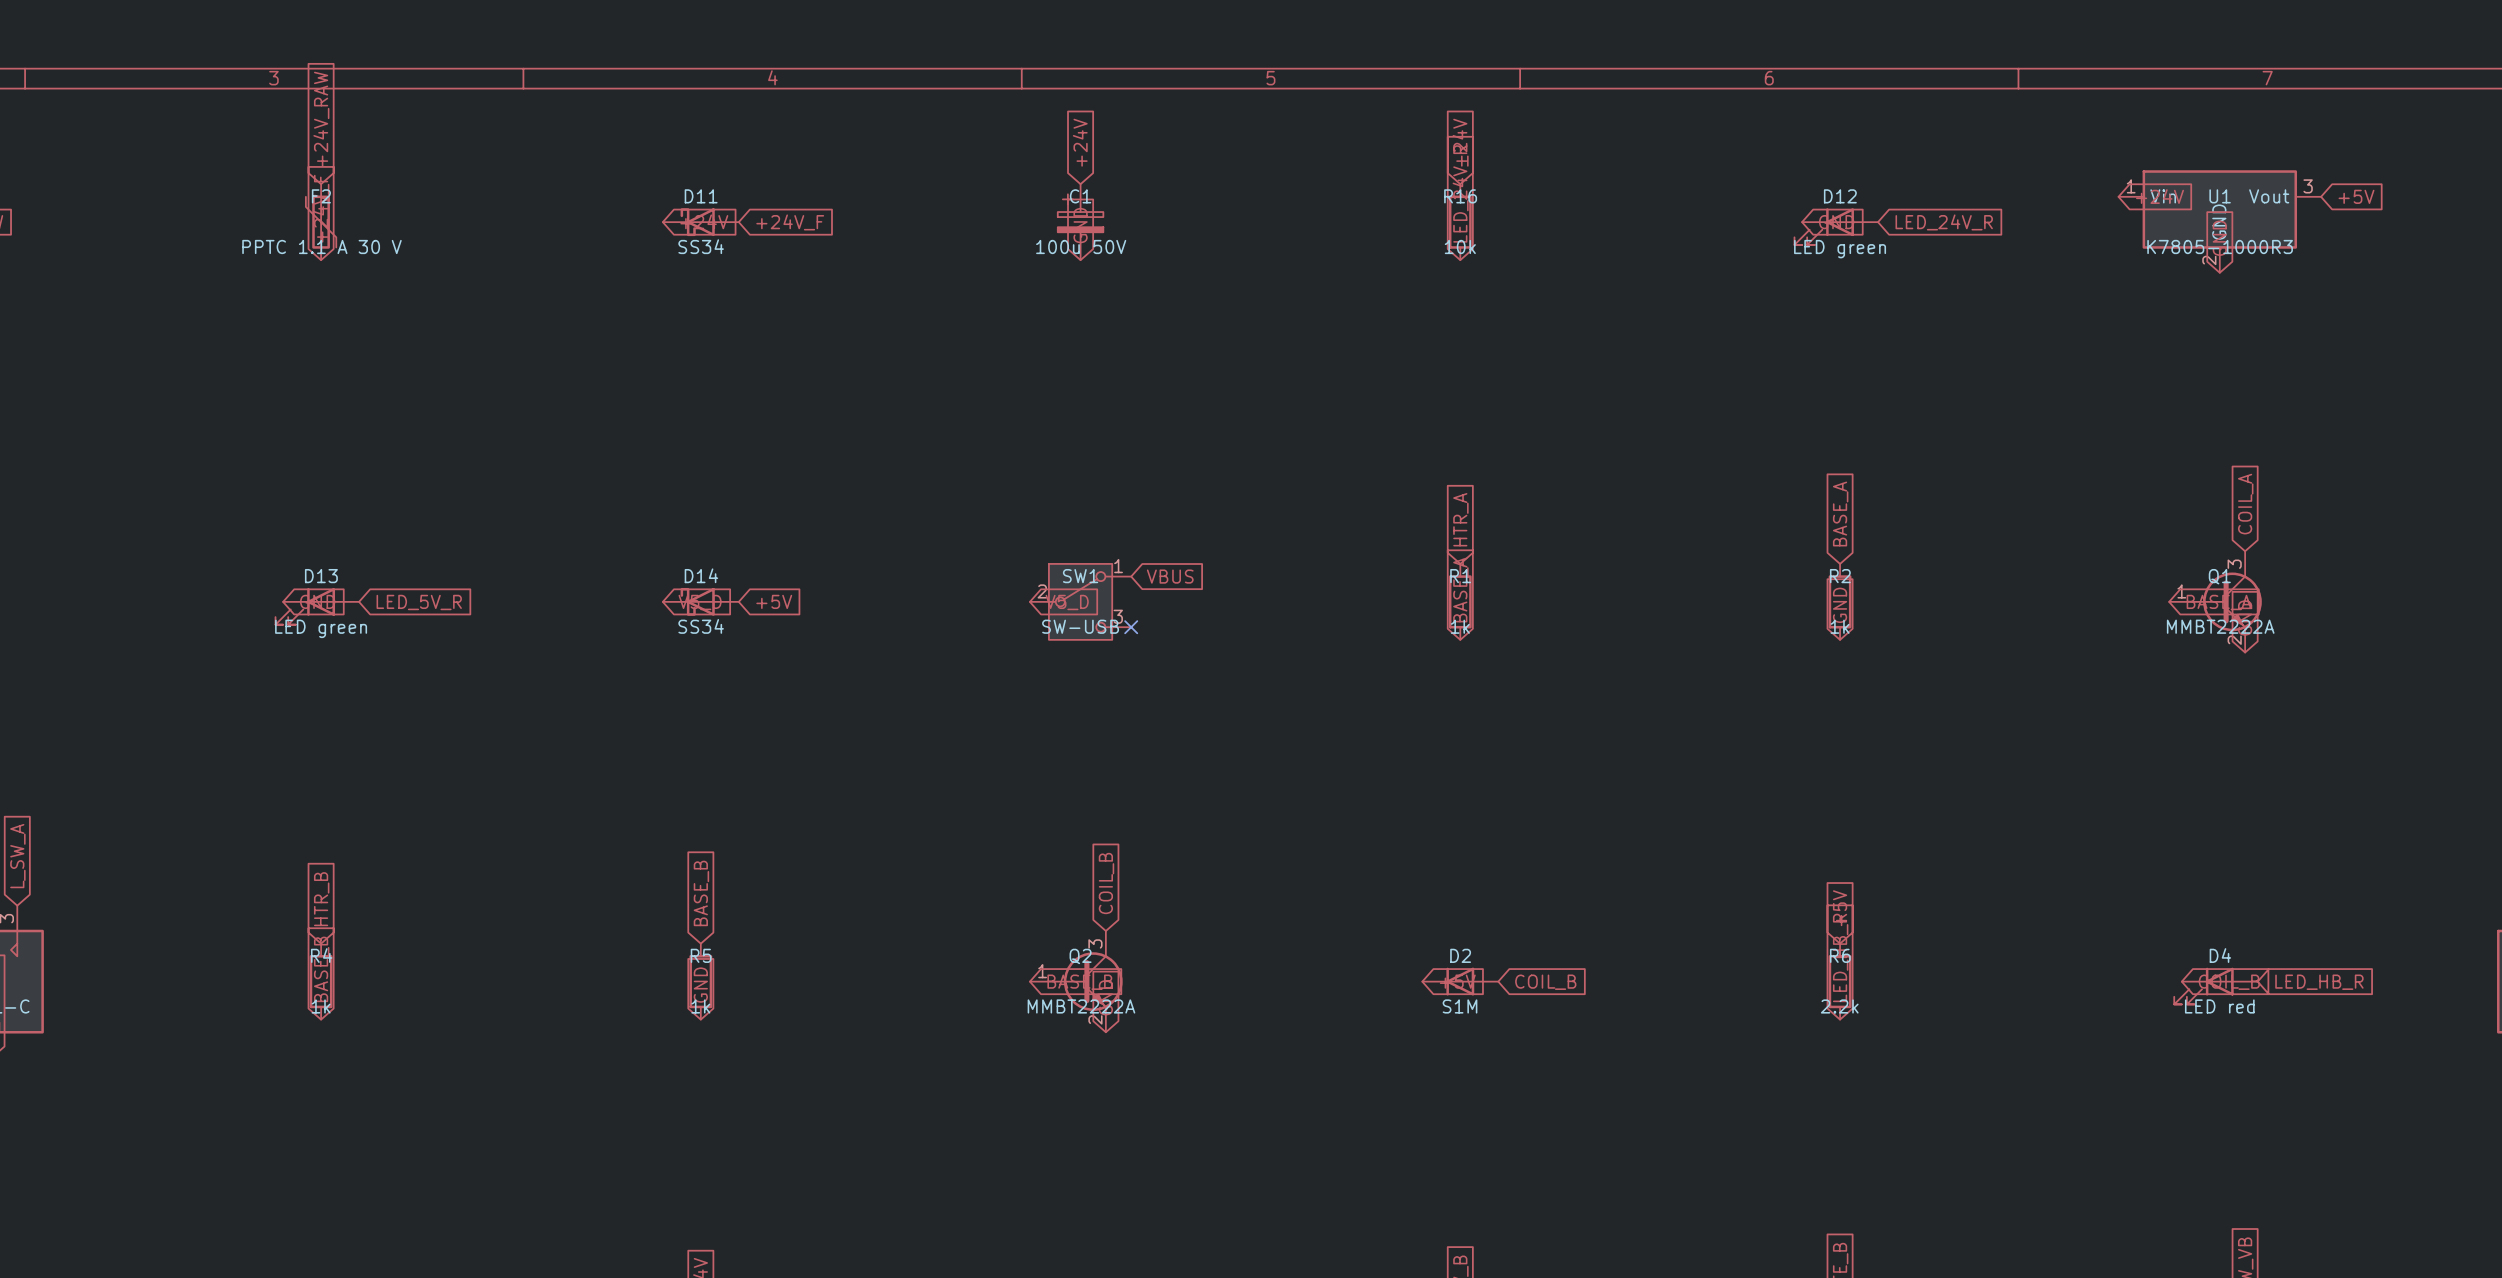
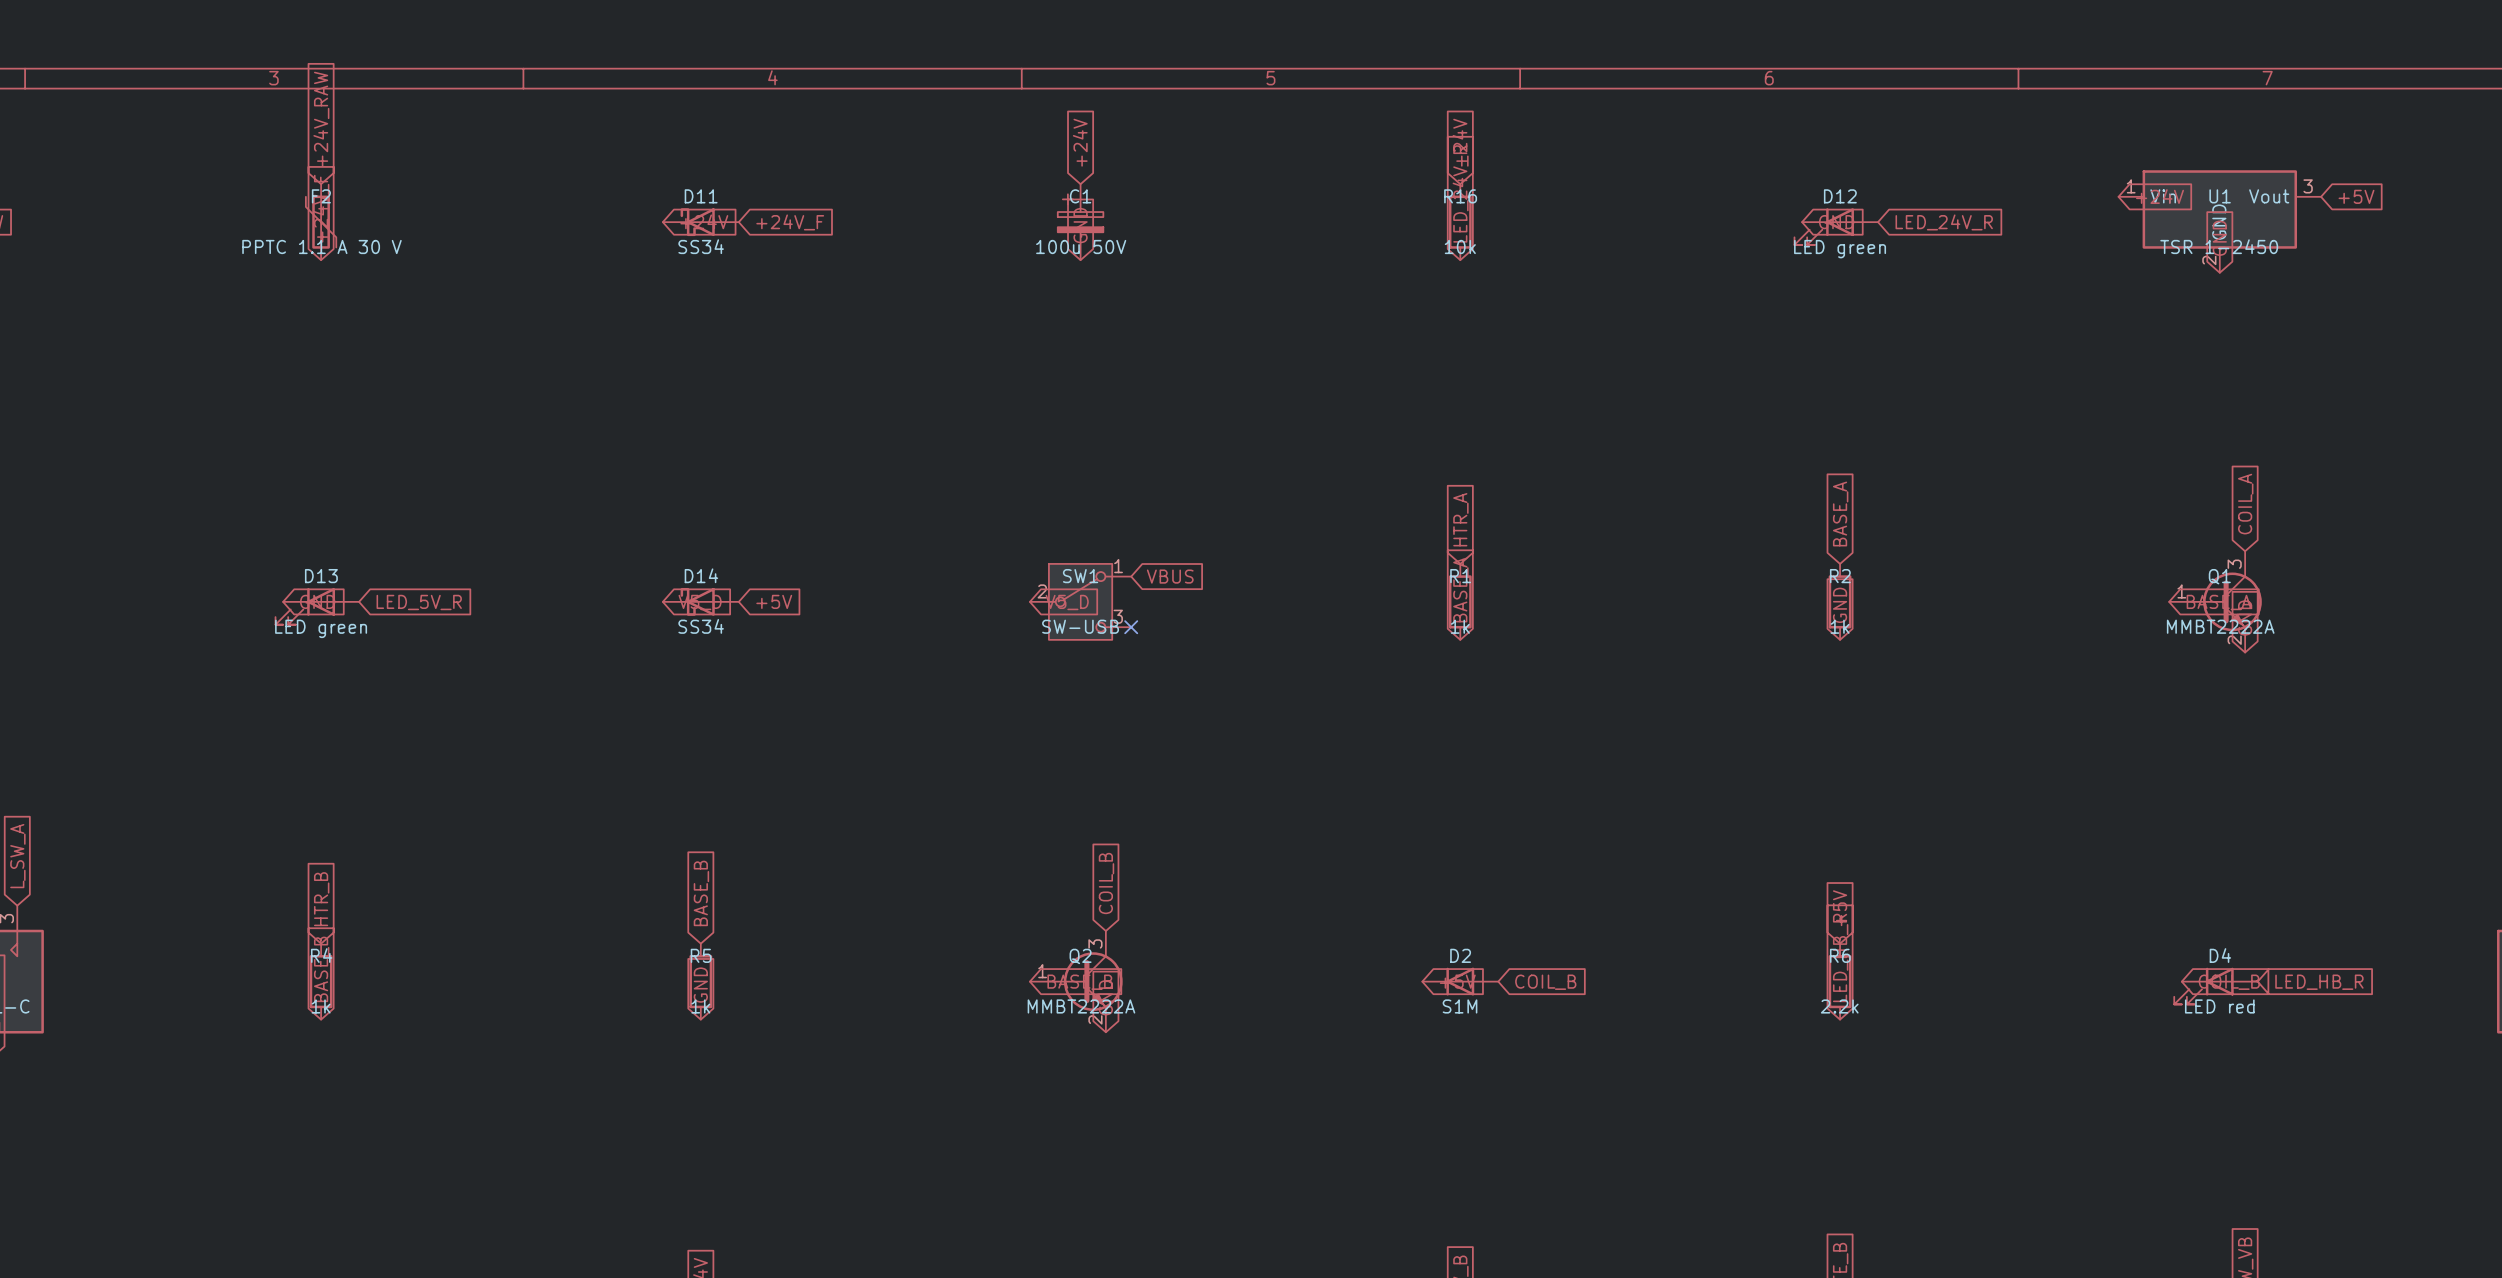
U1 value: K7805-1000R3 (2220, 246) -> TSR 1-2450 (2219, 246)

